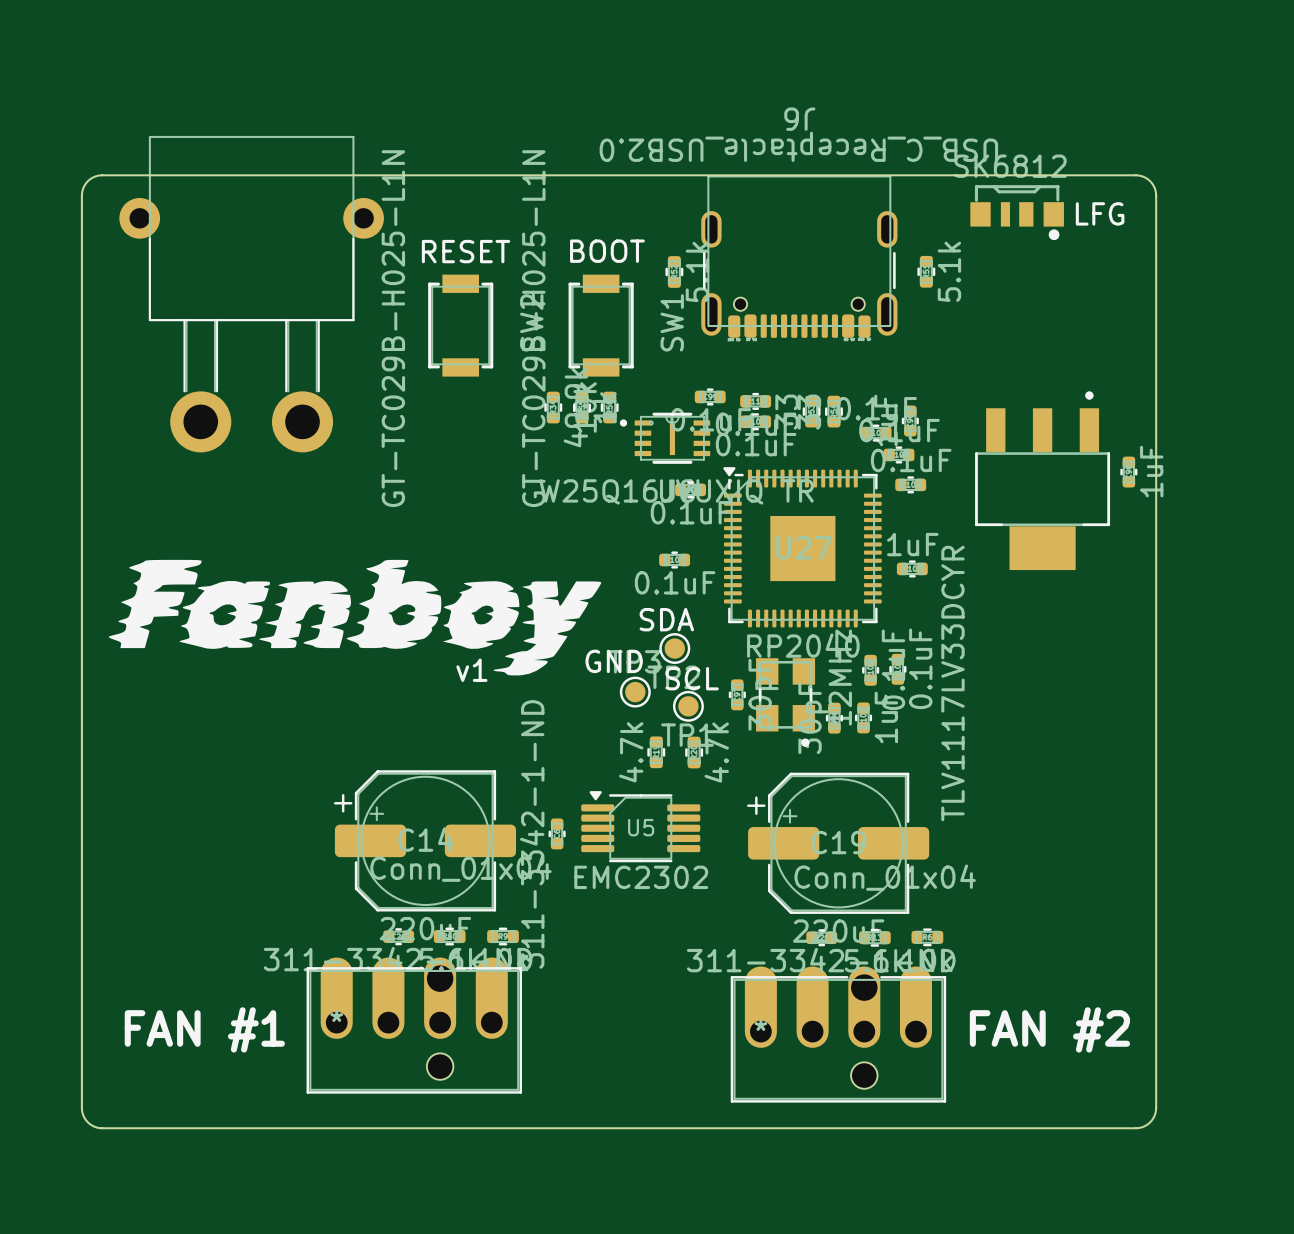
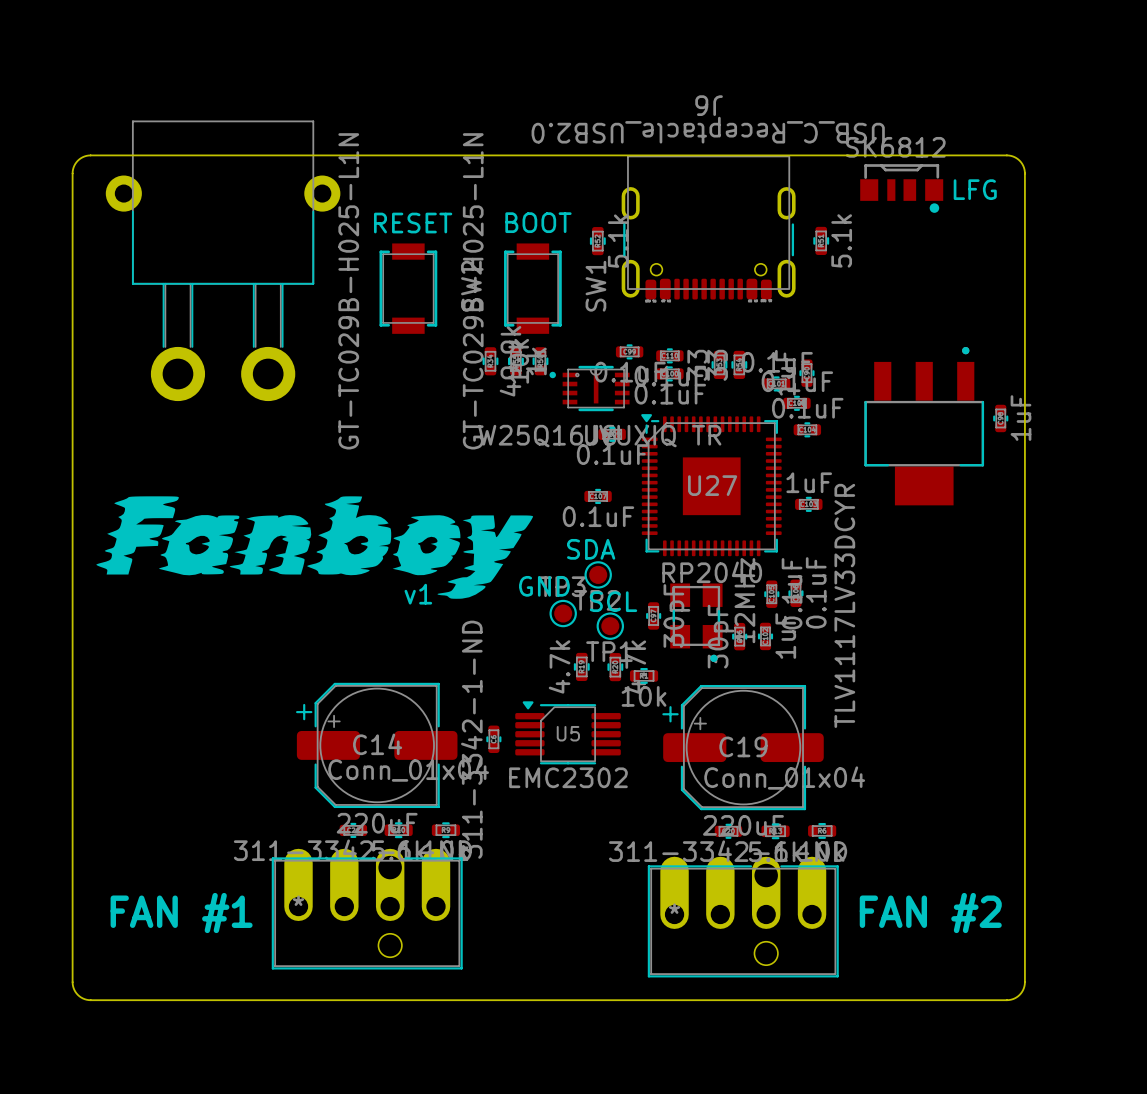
part: none -> 10k (644, 675)

